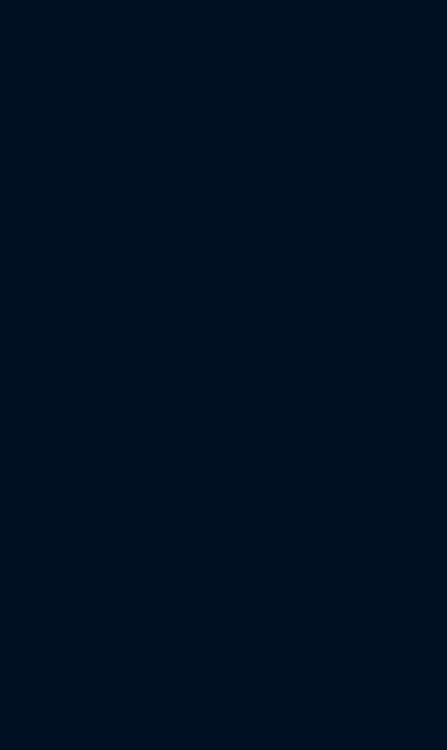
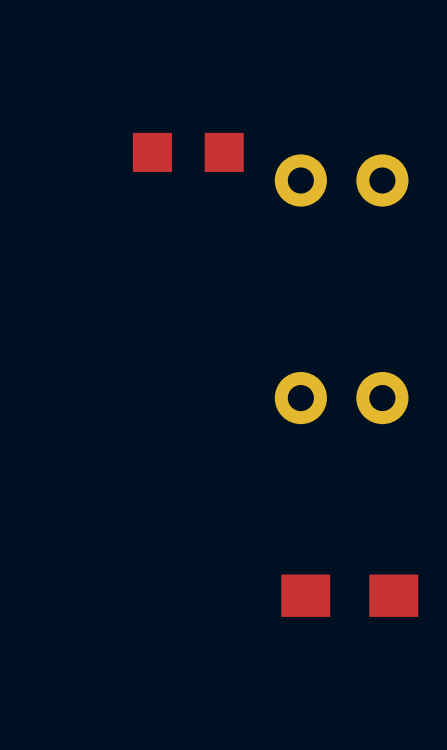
part: none -> (188, 152)
part: none -> (341, 180)
part: none -> (341, 398)
part: none -> (349, 595)

